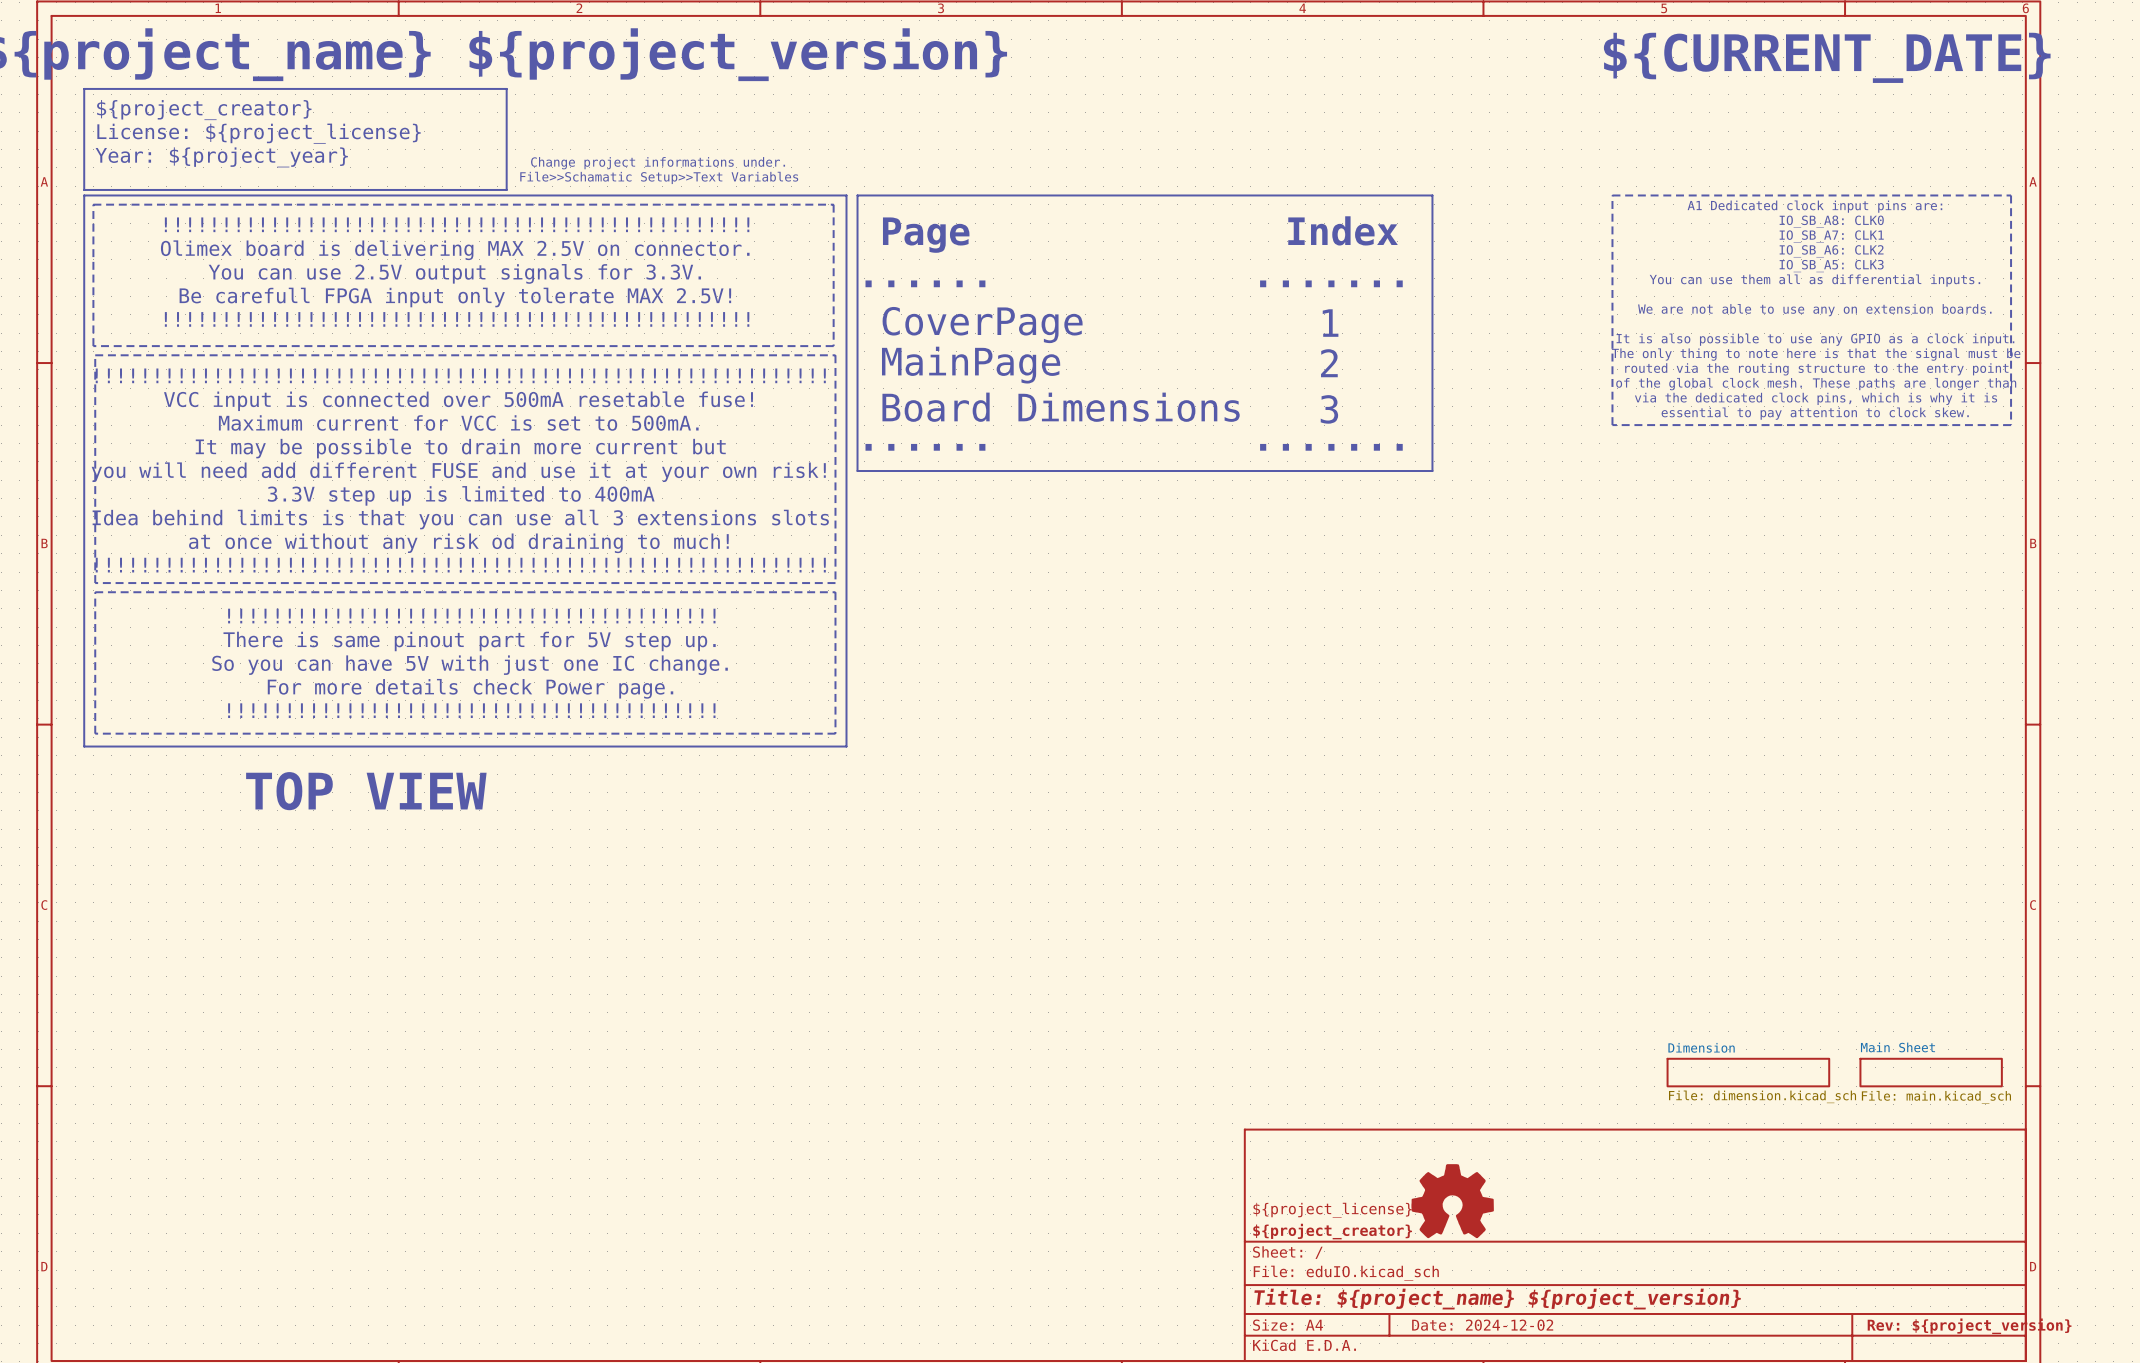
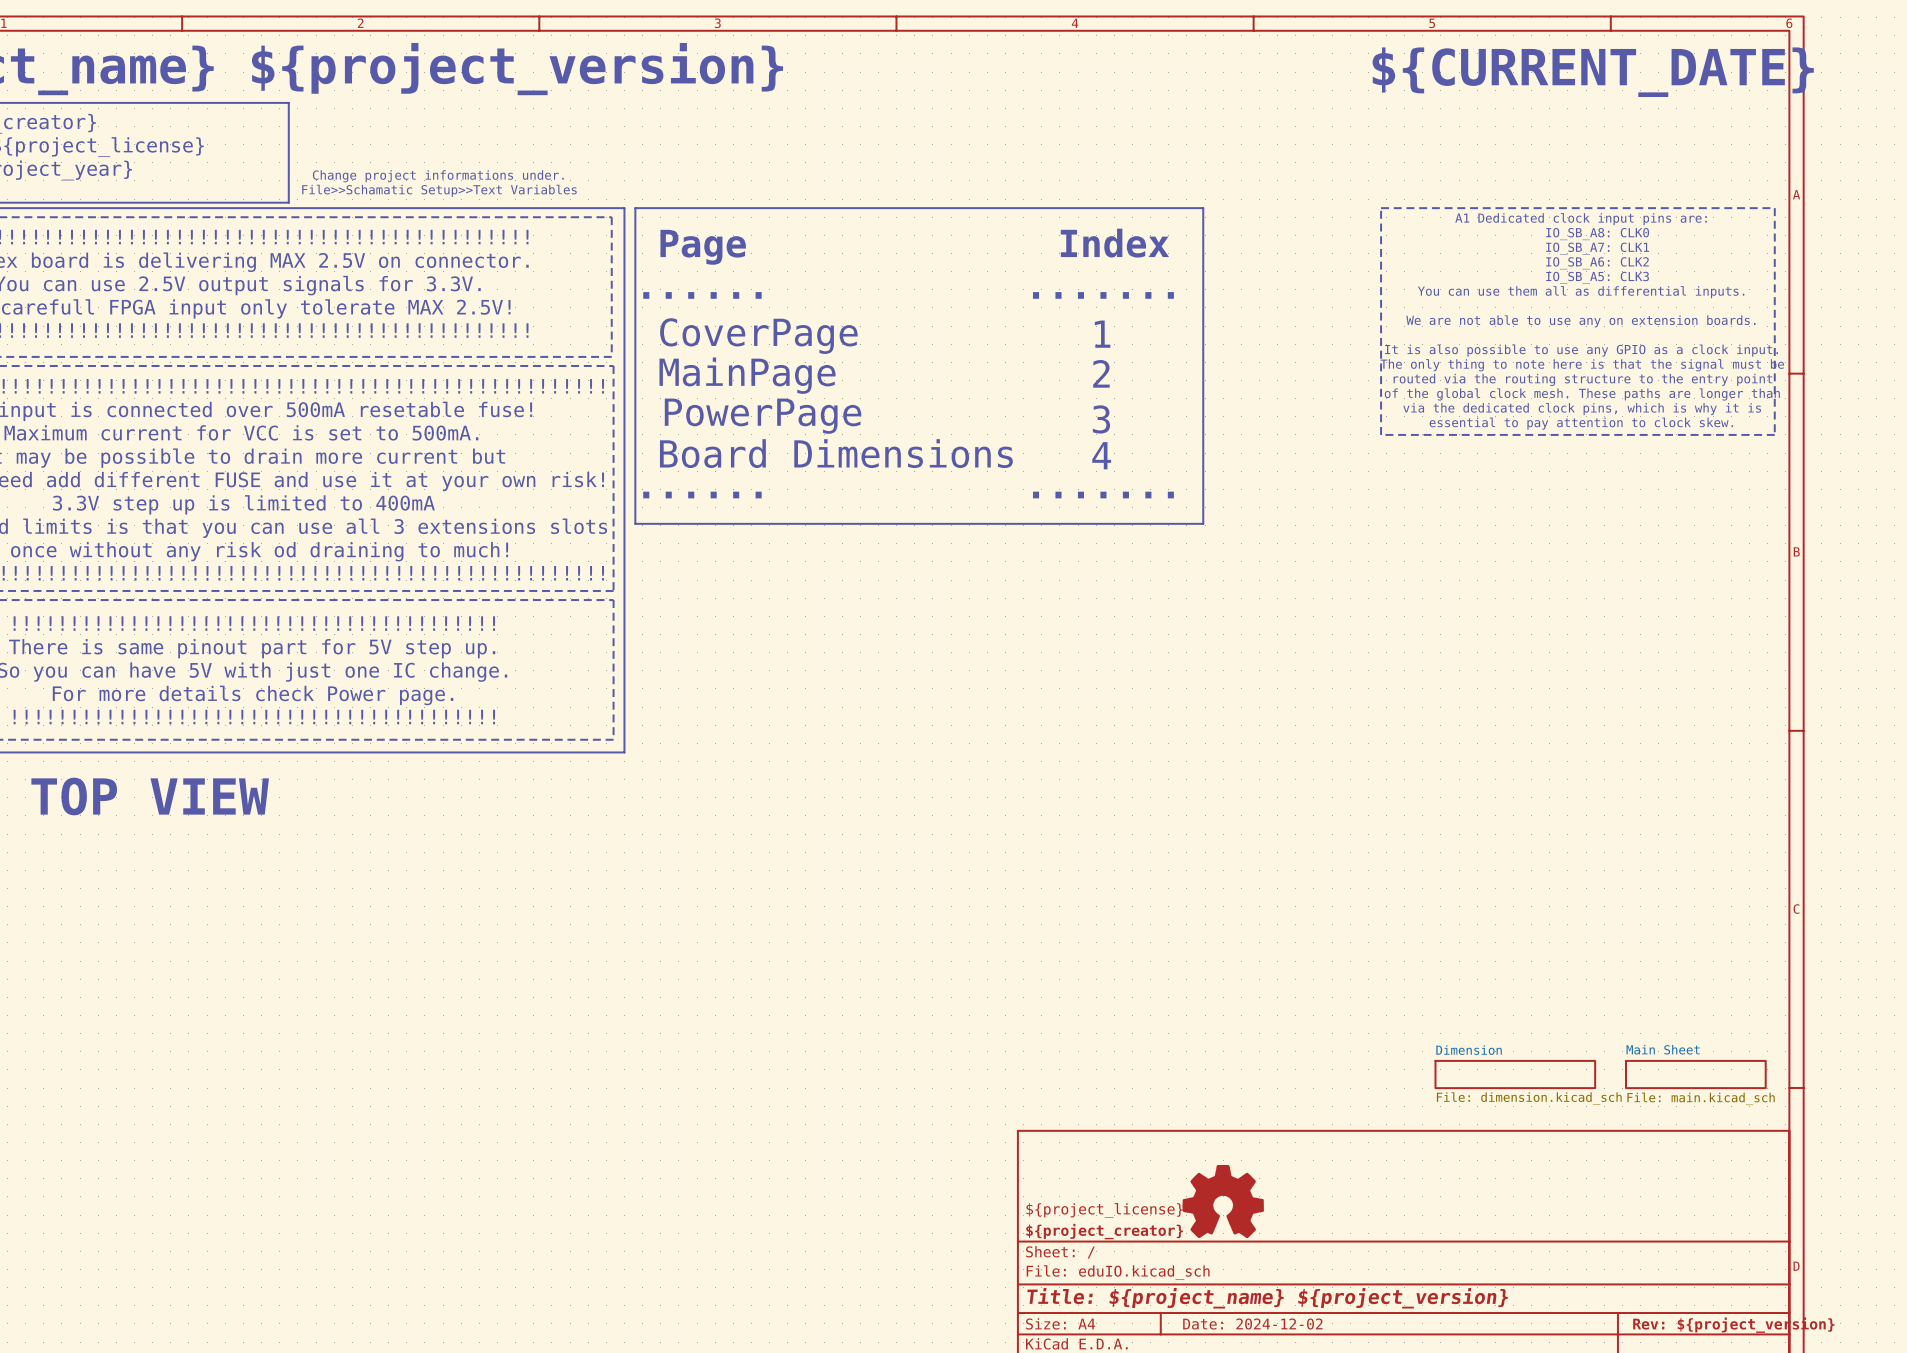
text: none -> PowerPage (763, 416)
text position: Board Dimensions (1061, 407) -> Board Dimensions (836, 453)
text: none -> 4 (1101, 455)
text position: ...... (925, 447) -> ...... (702, 495)
text position: ....... (1331, 447) -> ....... (1103, 495)
line: (857, 471) (1432, 471) -> (635, 480) (635, 523) (1203, 523) (1203, 480)

